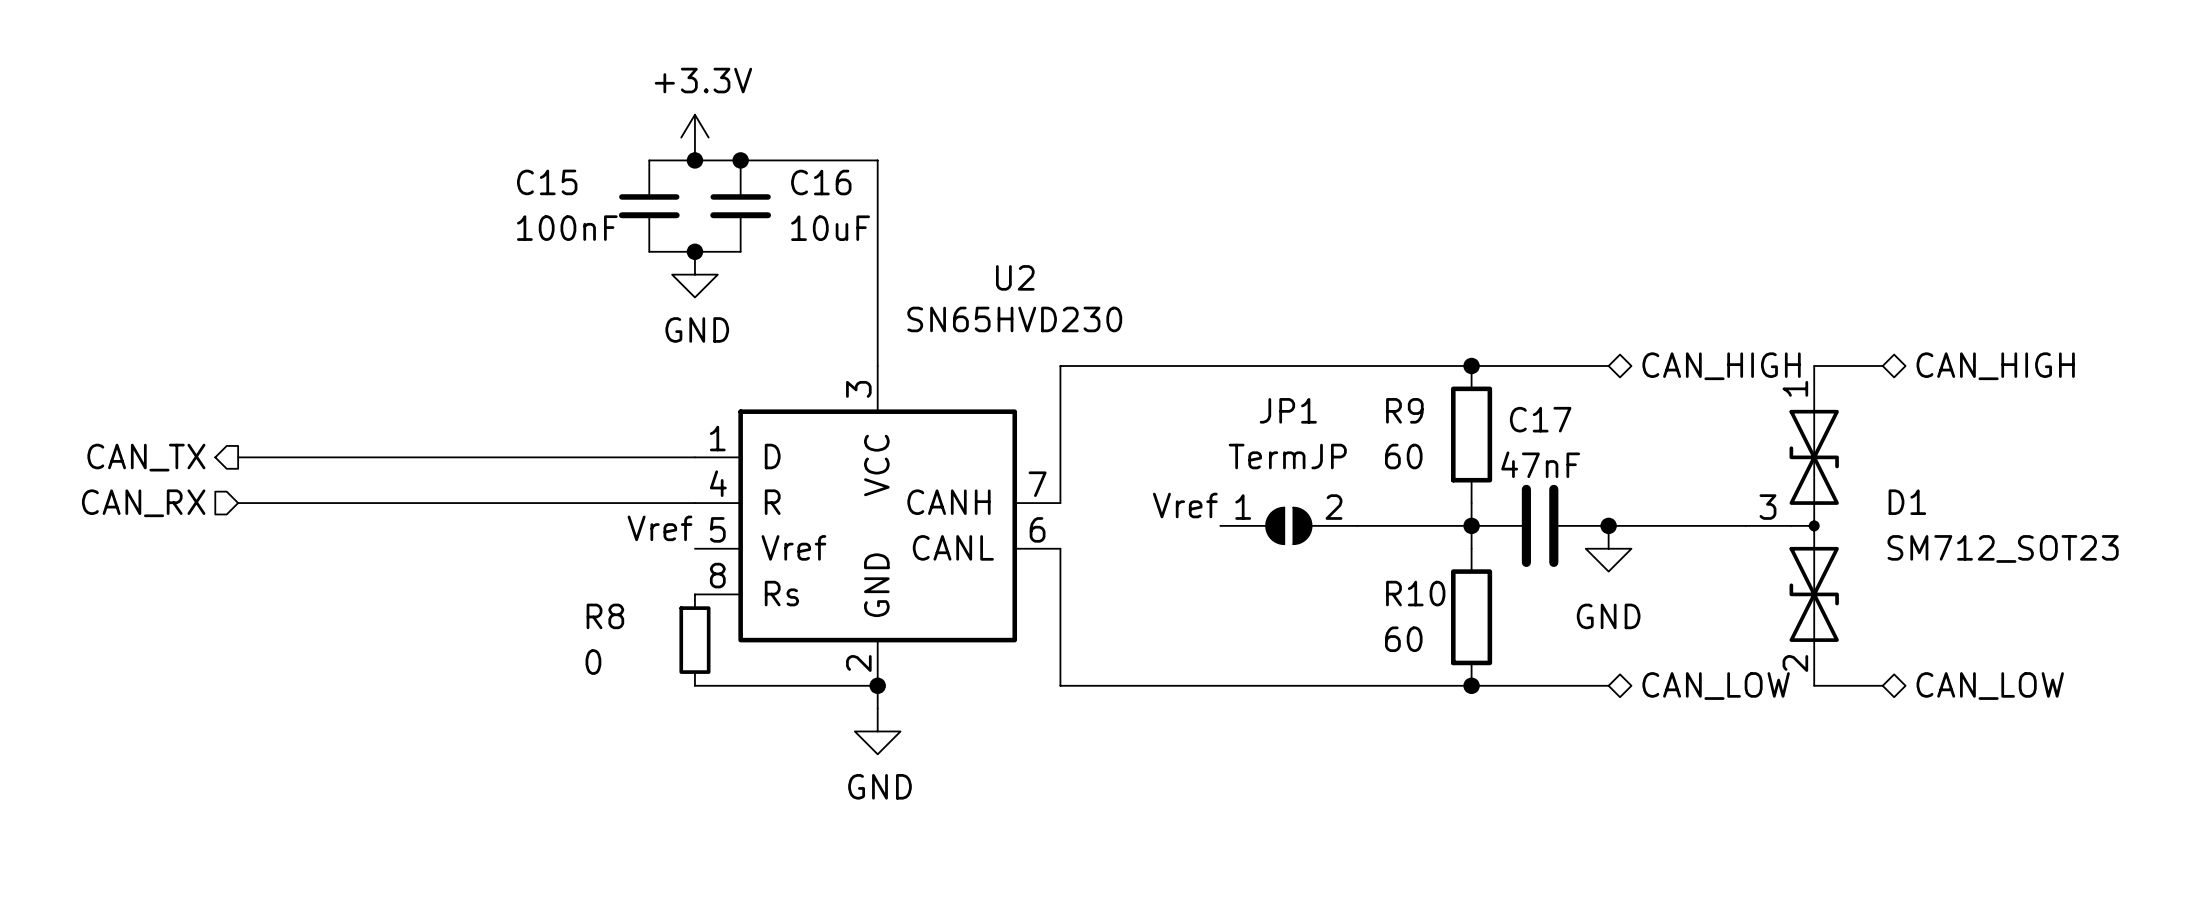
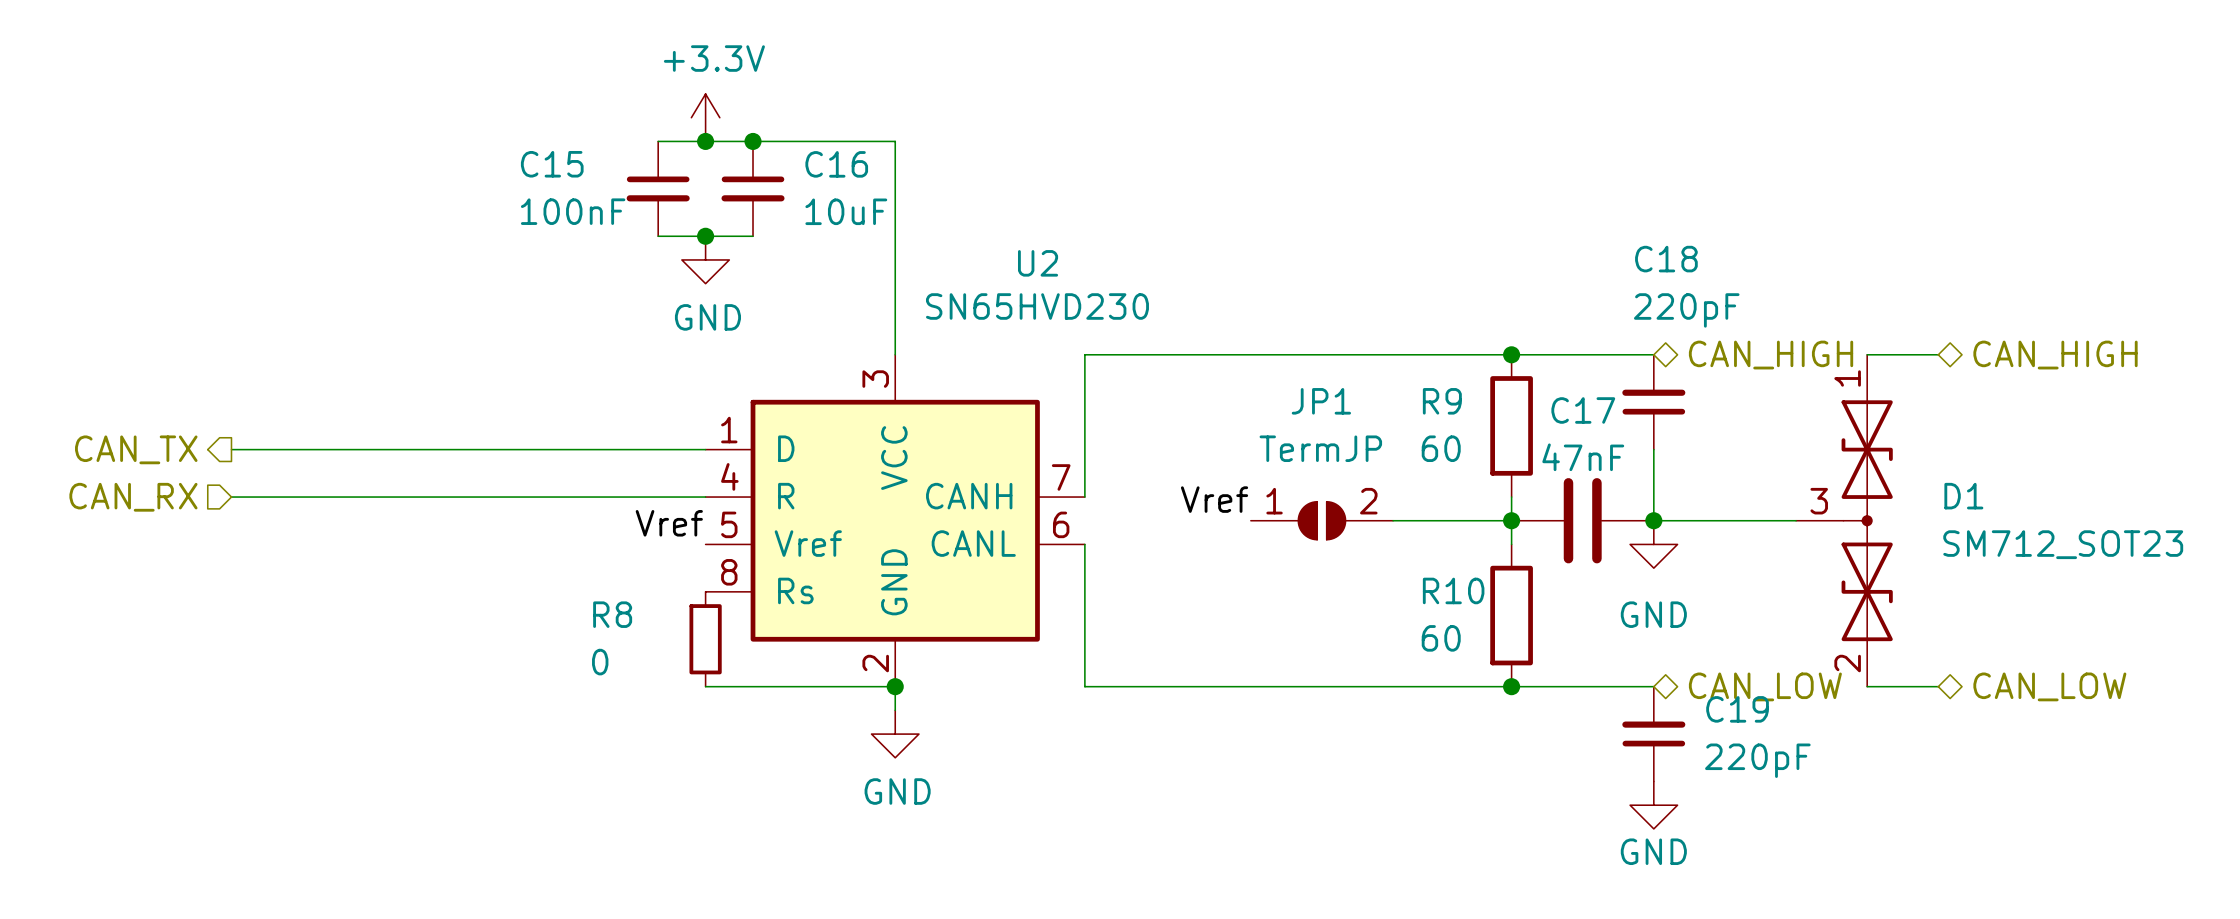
C18: none -> 220pF (1653, 402)
wire: none -> (1653, 449) (1653, 520)
C19: none -> 220pF (1653, 734)
power symbol: none -> GND (1653, 805)

